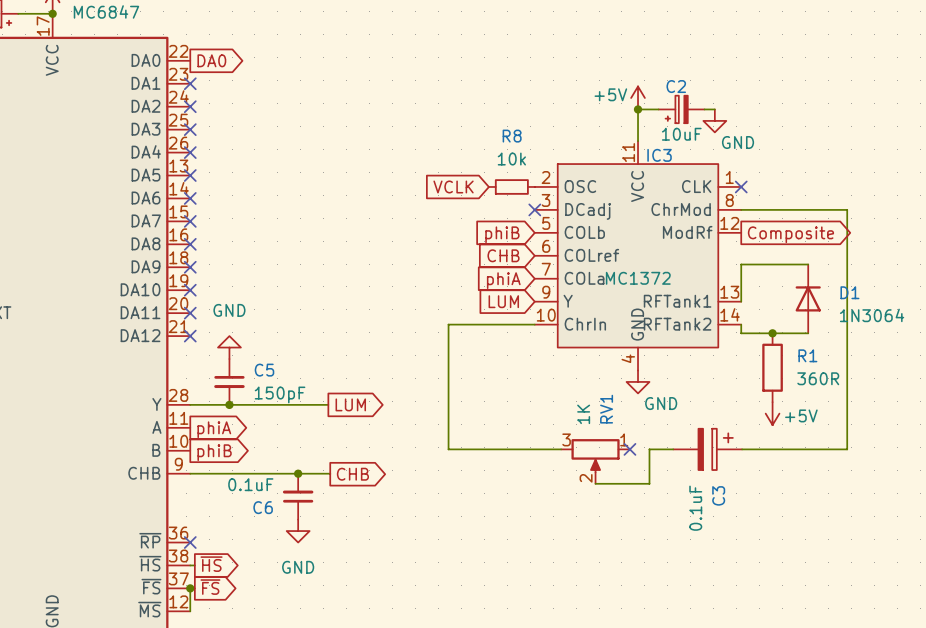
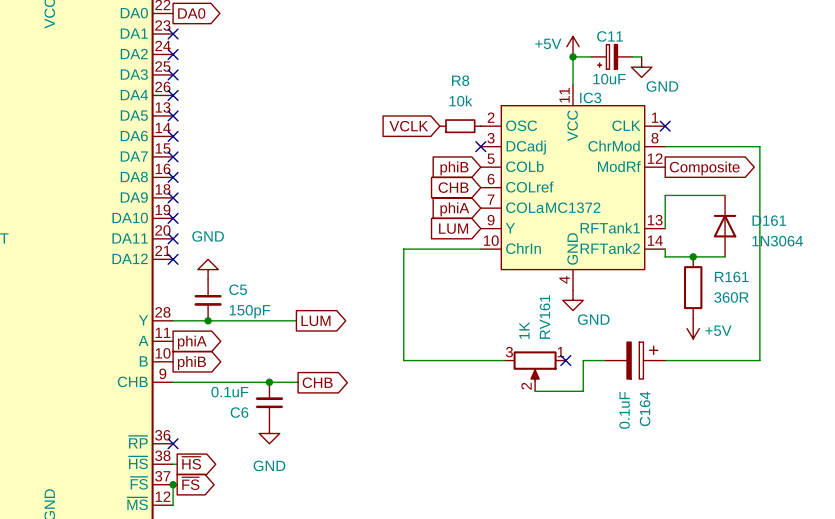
C2 name: C2 (676, 86) -> C11 (610, 36)
D1 name: D1 (849, 292) -> D161 (769, 220)
R1 name: R1 (807, 355) -> R161 (731, 276)
RV1 name: RV1 (606, 409) -> RV161 (544, 317)
C3 name: C3 (718, 495) -> C164 (645, 408)

